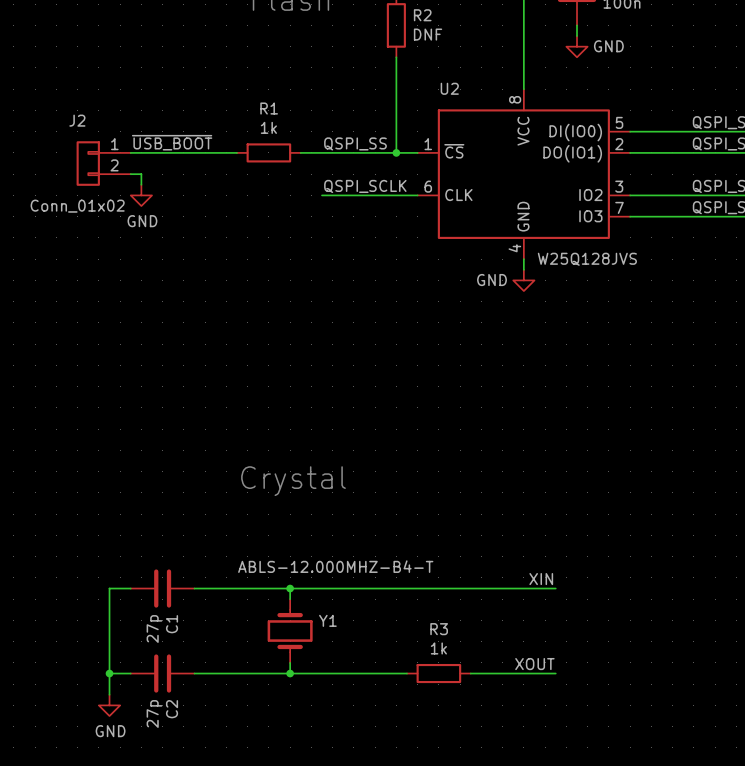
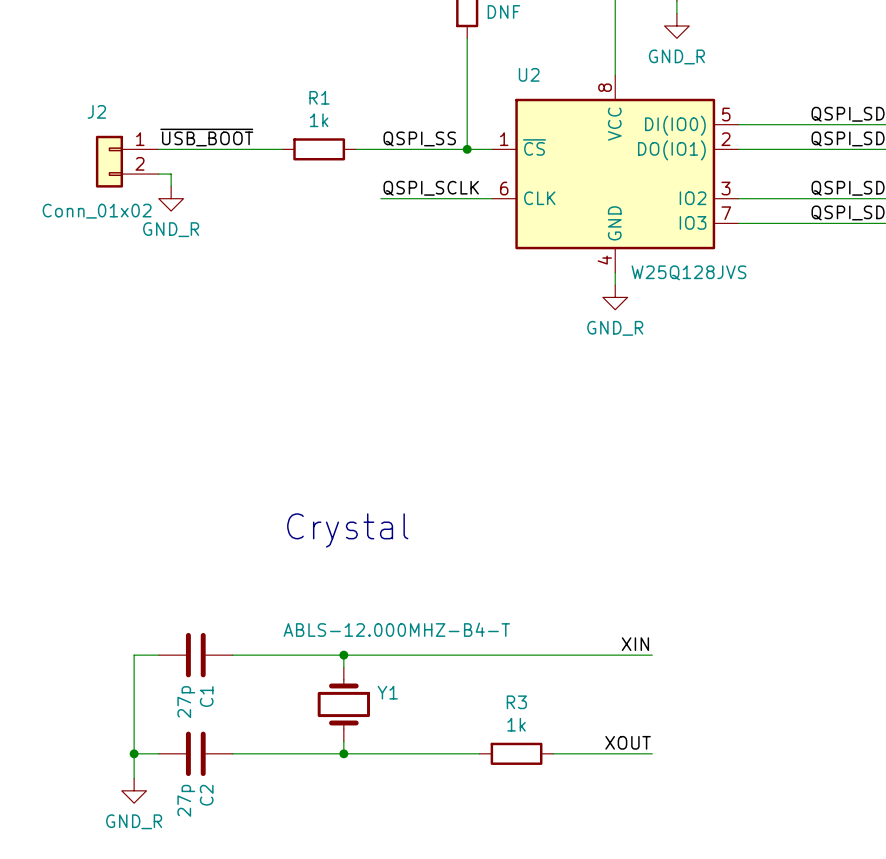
power symbol: GND (577, 46) -> GND_R (676, 26)
power symbol: GND (141, 195) -> GND_R (171, 198)
power symbol: GND (523, 280) -> GND_R (615, 297)
power symbol: GND (109, 705) -> GND_R (134, 790)

